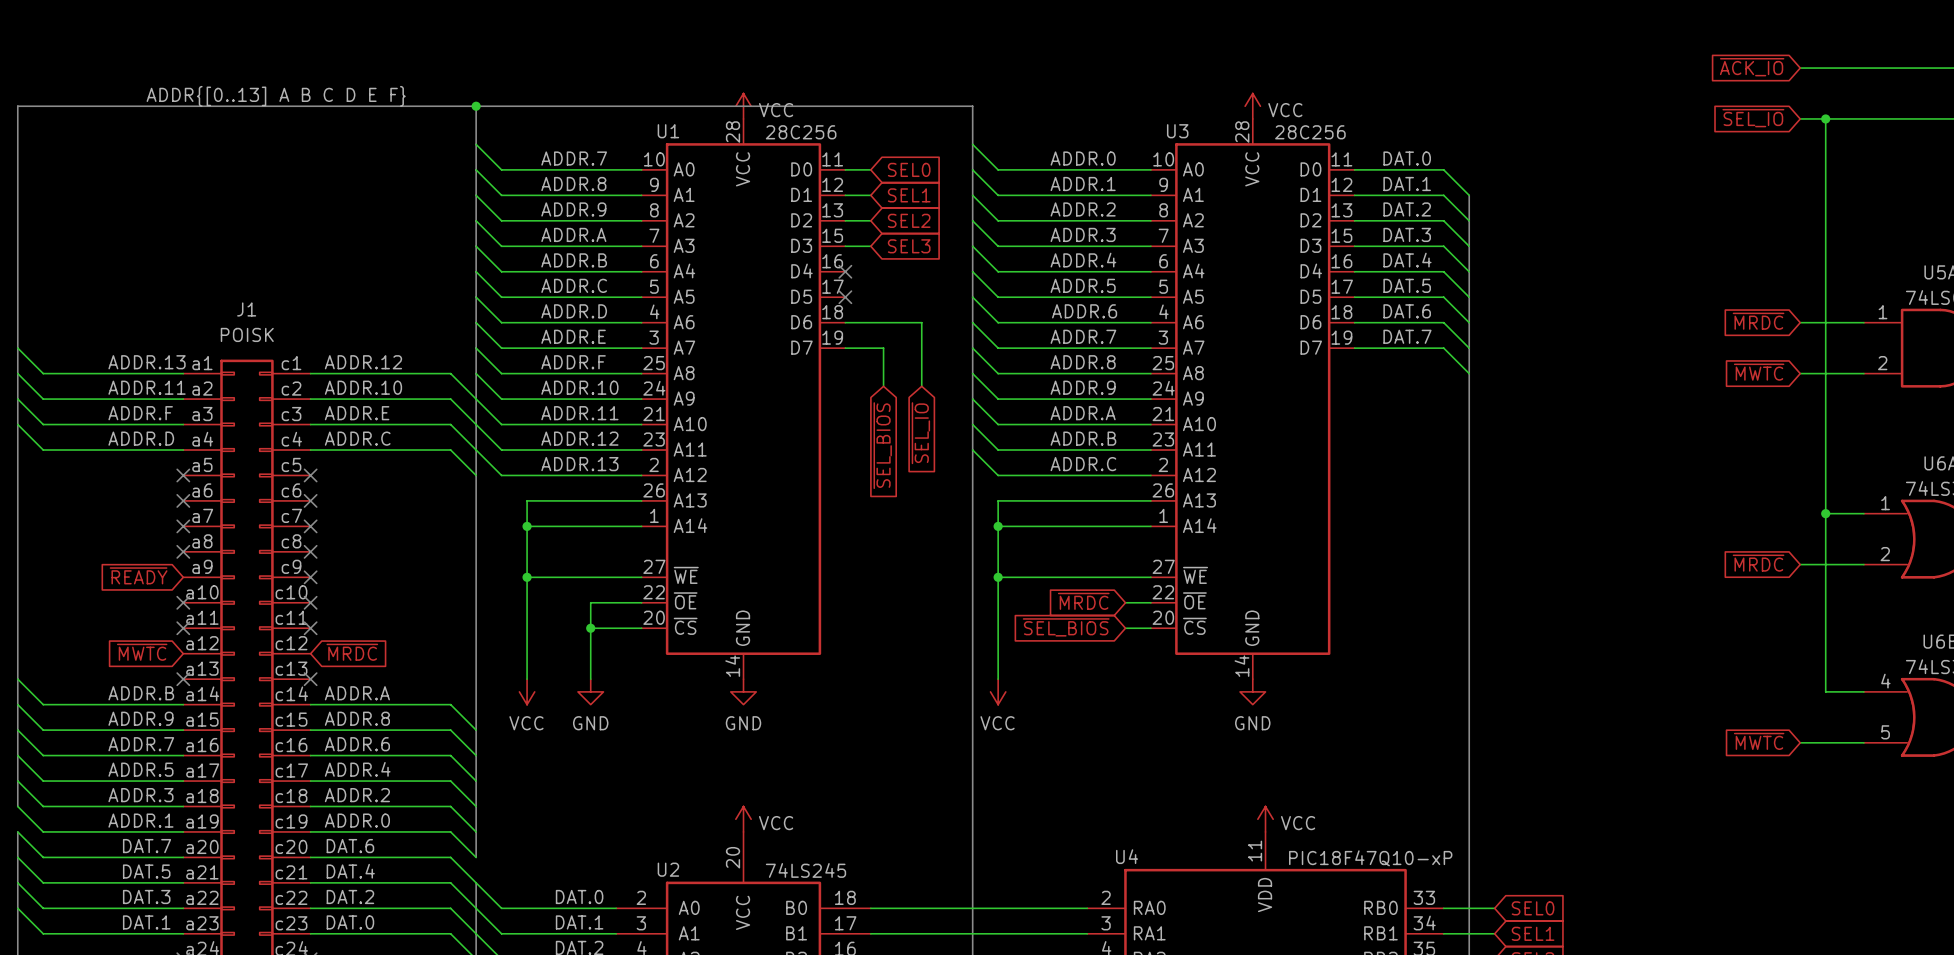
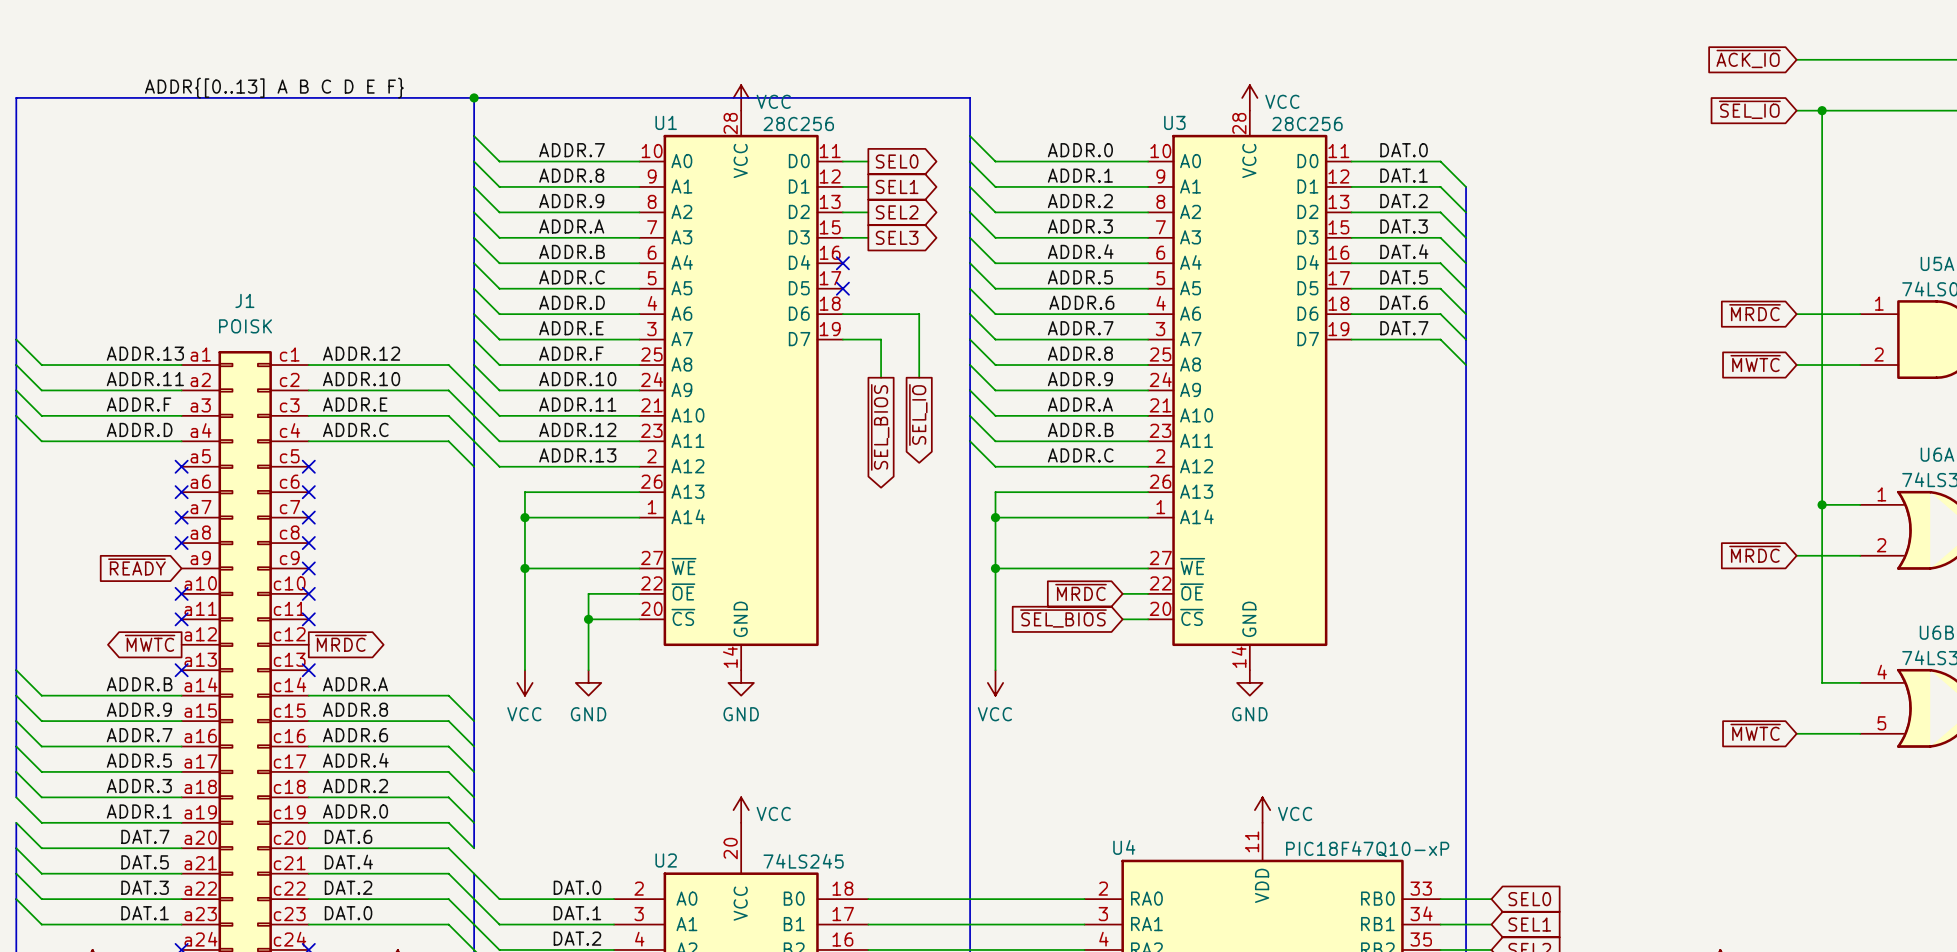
global label shape: input (909, 169) -> output (897, 161)
global label shape: input (909, 195) -> output (897, 186)
global label shape: input (909, 220) -> output (897, 212)
global label shape: input (909, 246) -> output (897, 237)
global label shape: input (920, 433) -> output (918, 414)
global label shape: input (882, 445) -> output (880, 427)
global label shape: input (142, 652) -> output (150, 643)
global label shape: input (352, 652) -> output (340, 643)

